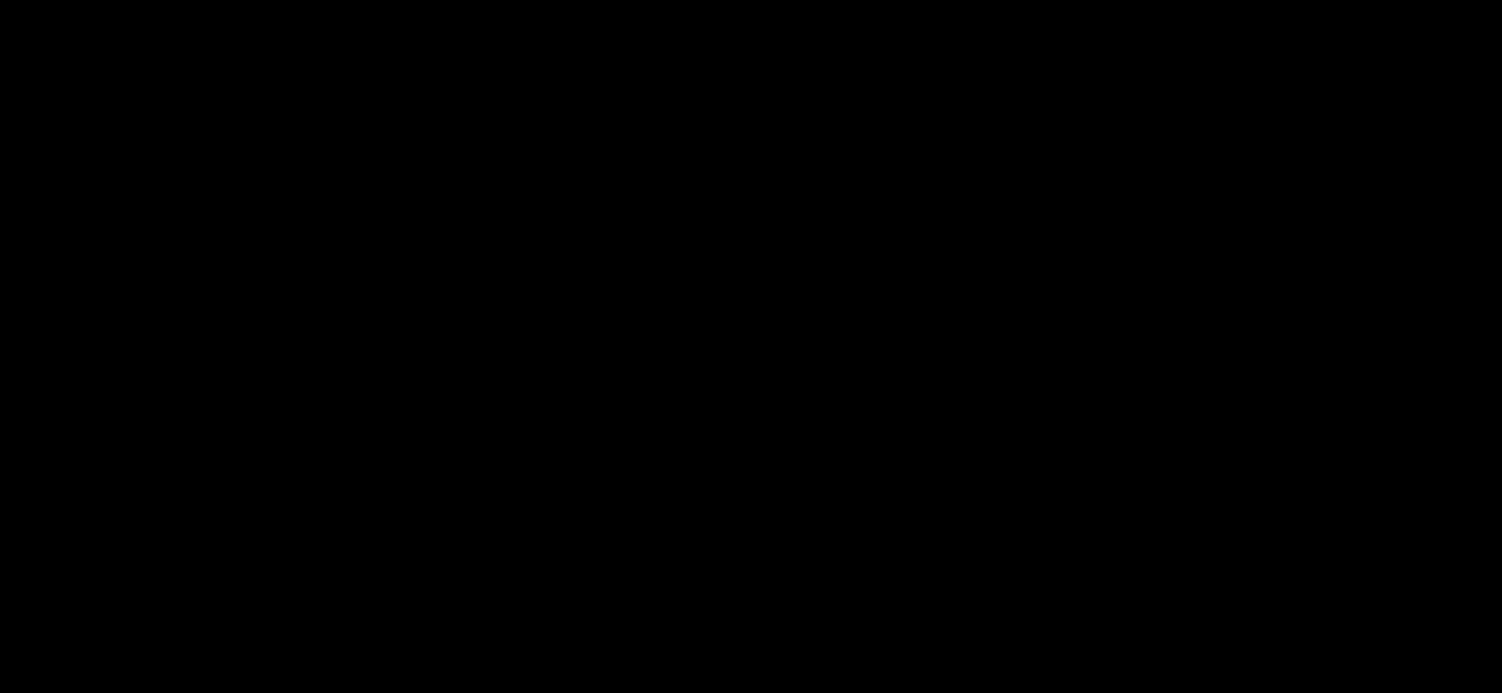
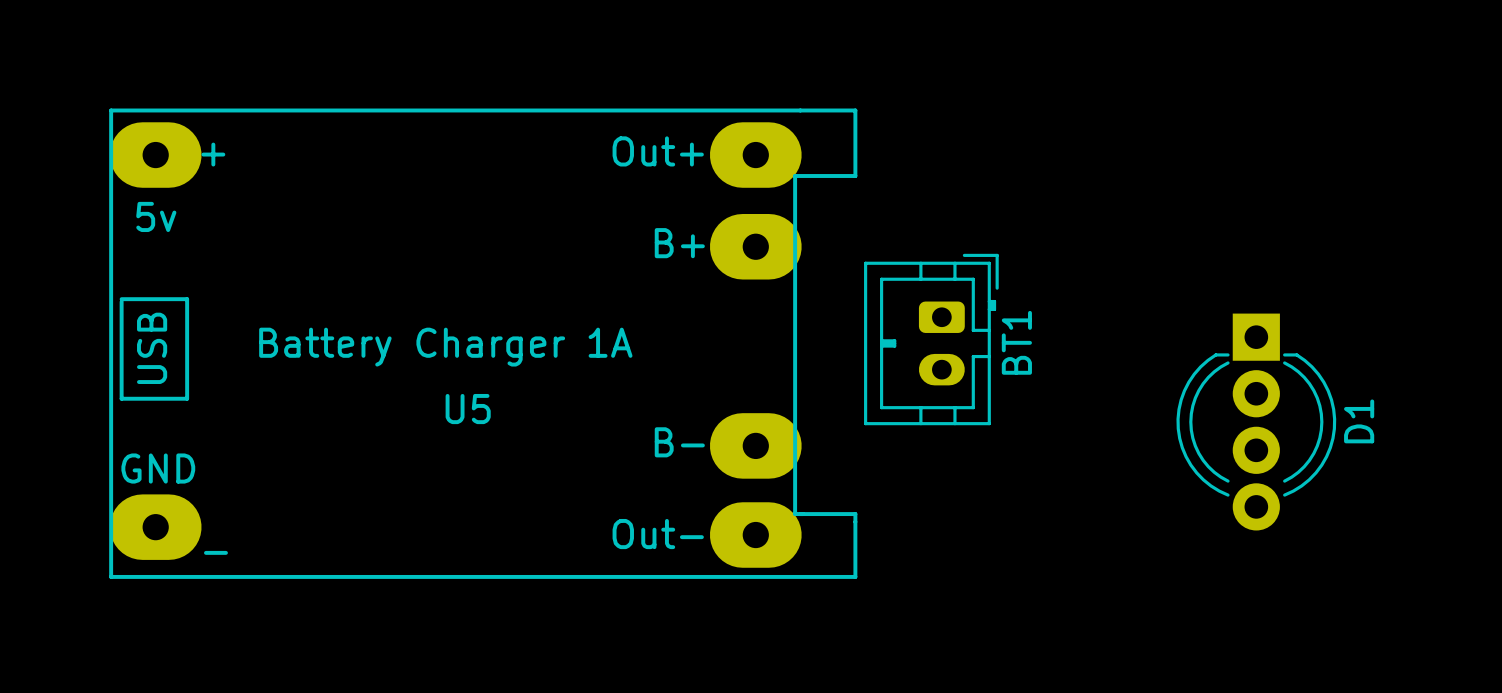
BT1: none -> (931, 339)
U5: none -> (483, 343)
D1: none -> (1256, 422)

